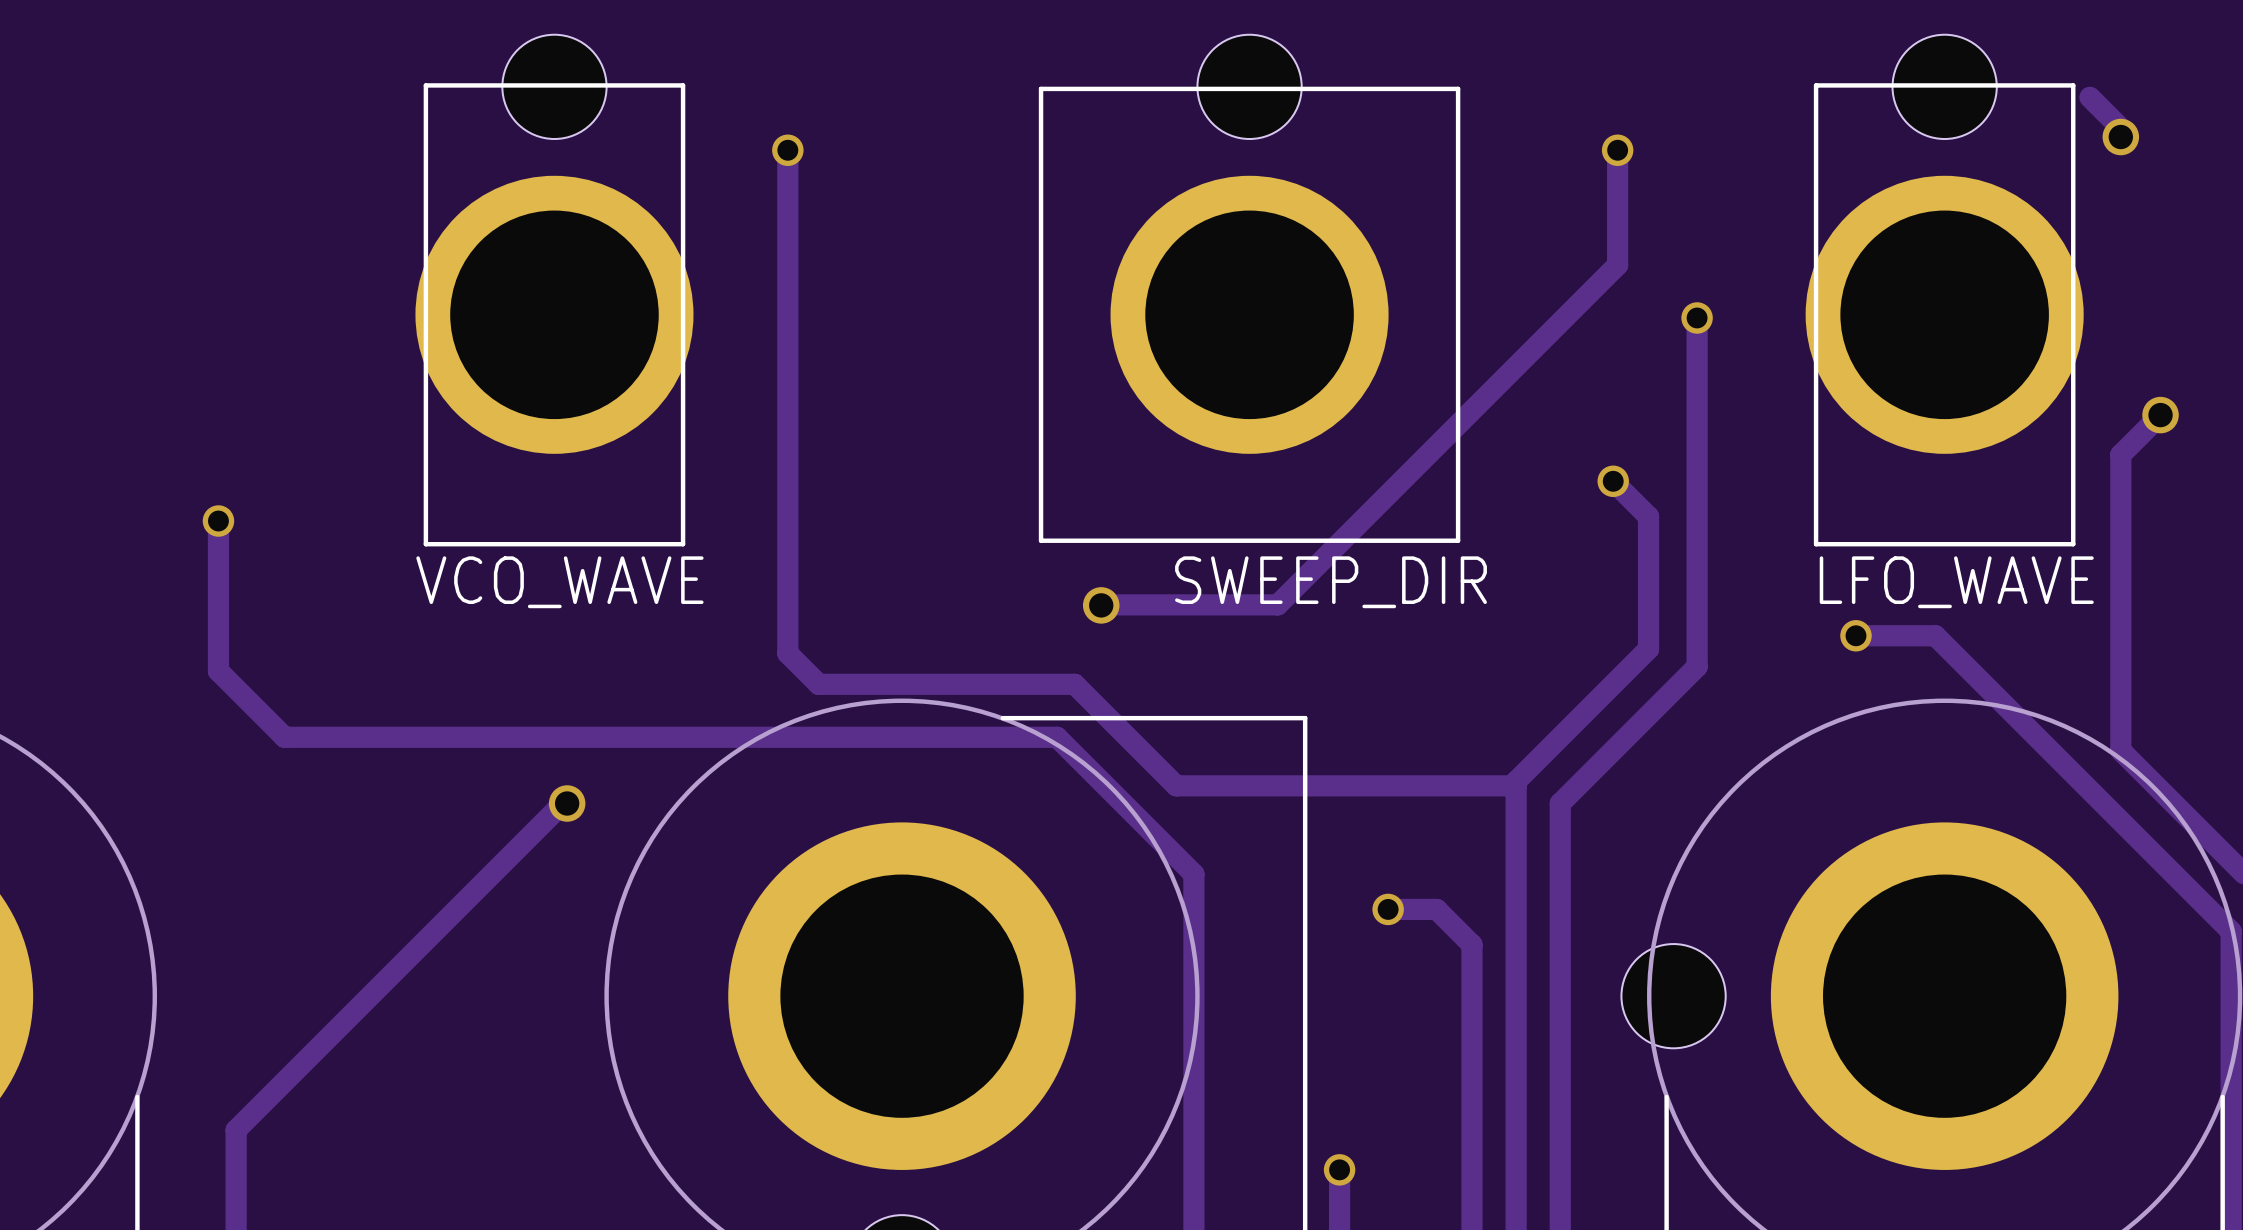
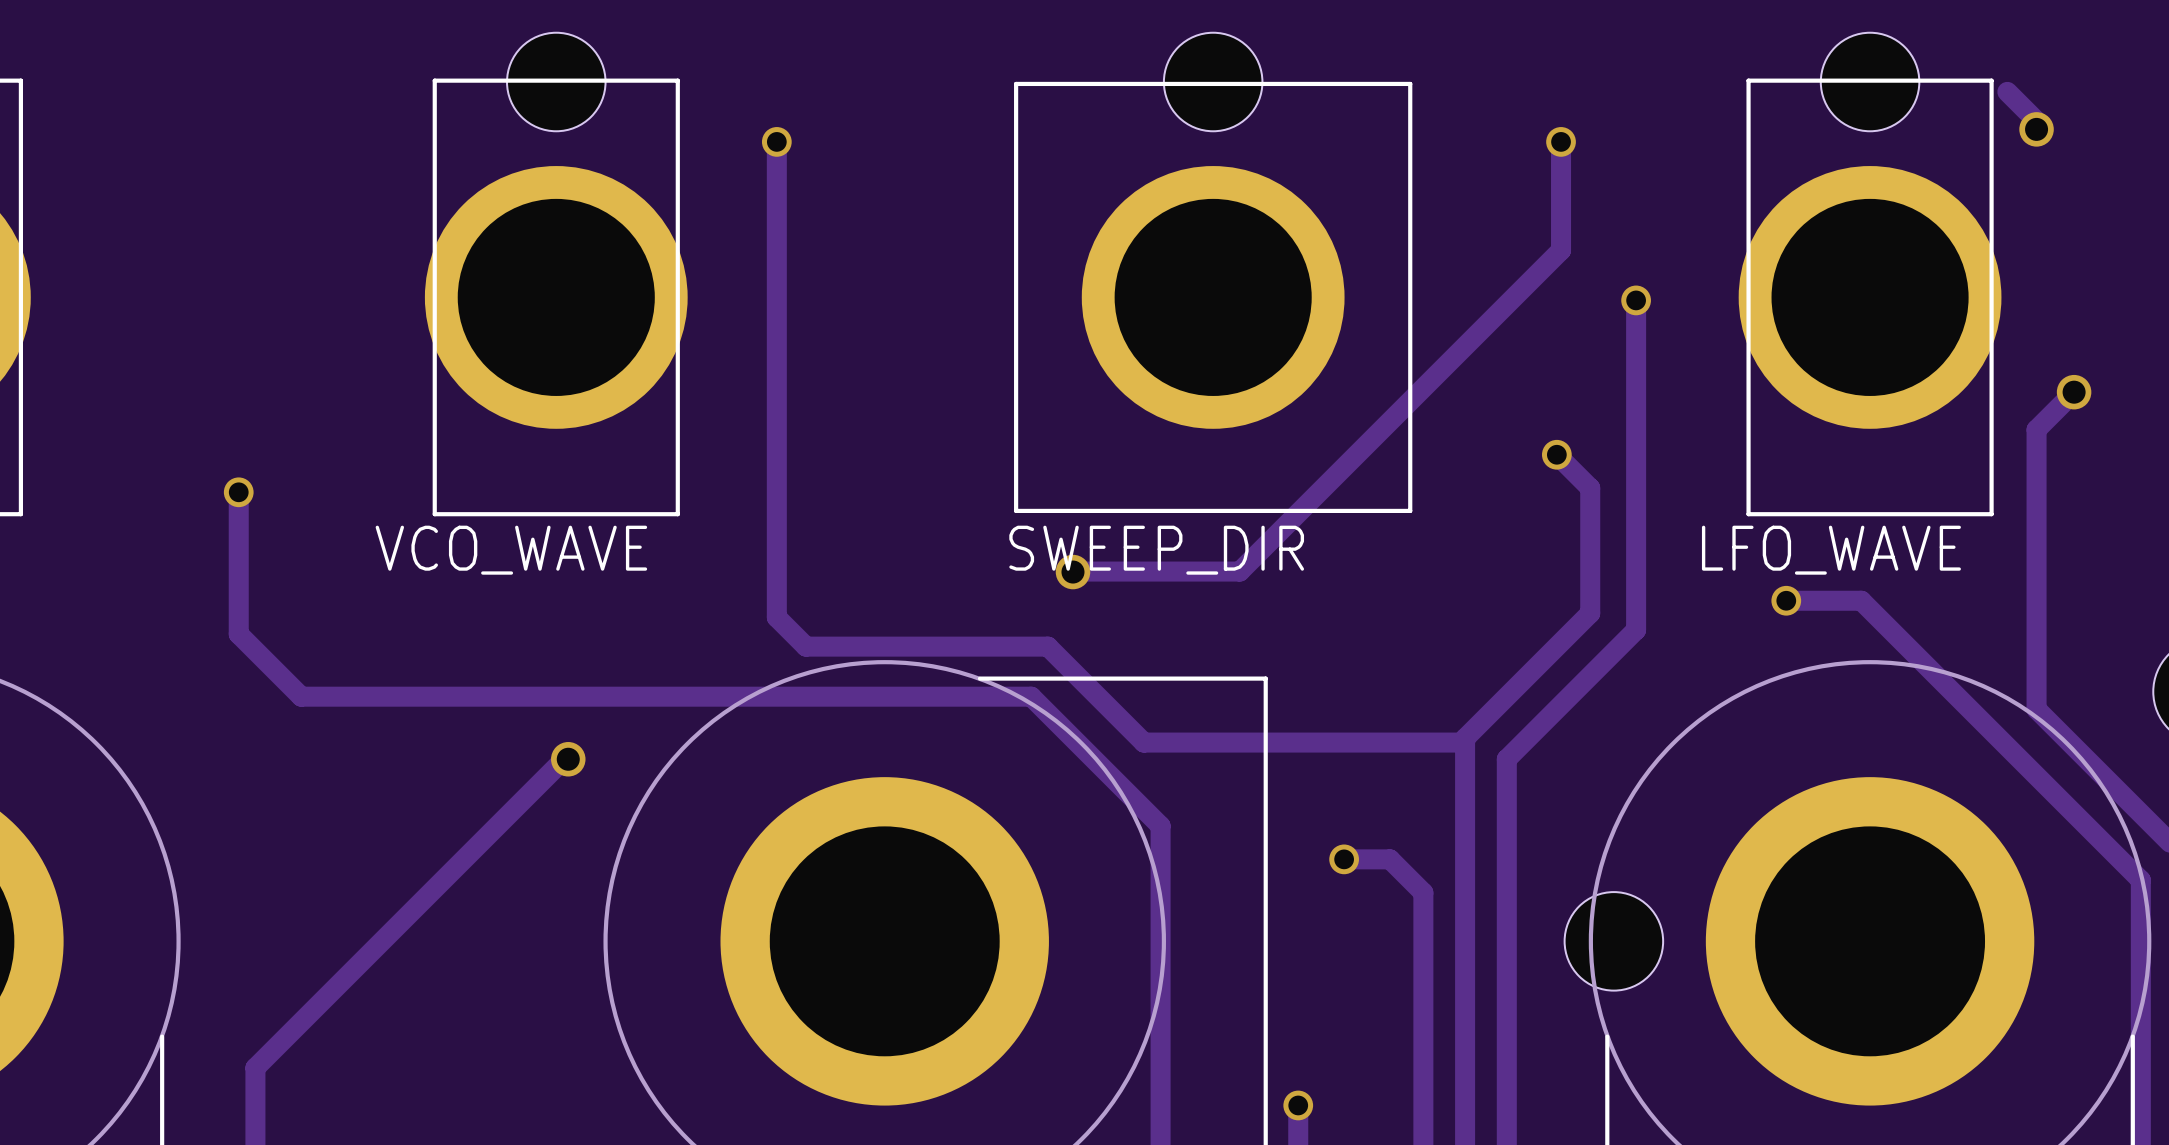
VCO_WAVE name position: VCO_WAVE (559, 582) -> VCO_WAVE (511, 550)
SWEEP_DIR name position: SWEEP_DIR (1331, 582) -> SWEEP_DIR (1156, 550)
LFO_WAVE name position: LFO_WAVE (1956, 582) -> LFO_WAVE (1831, 550)

